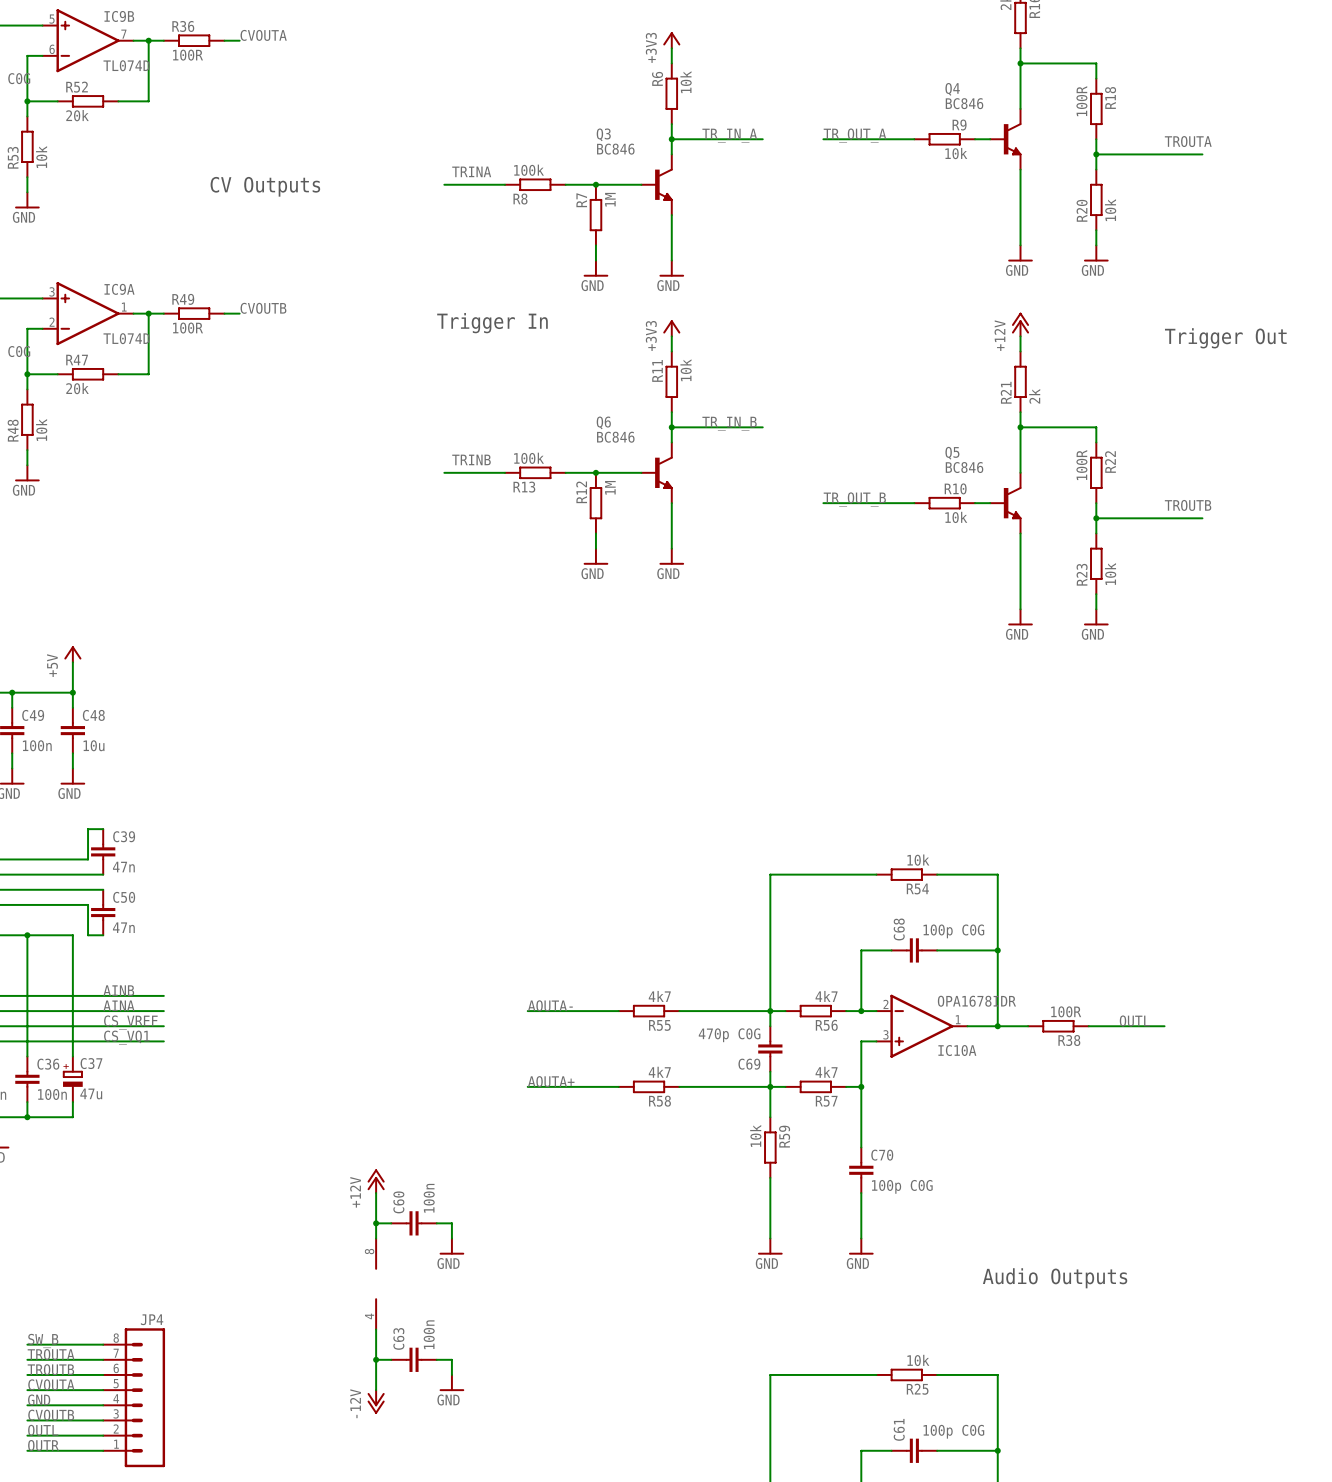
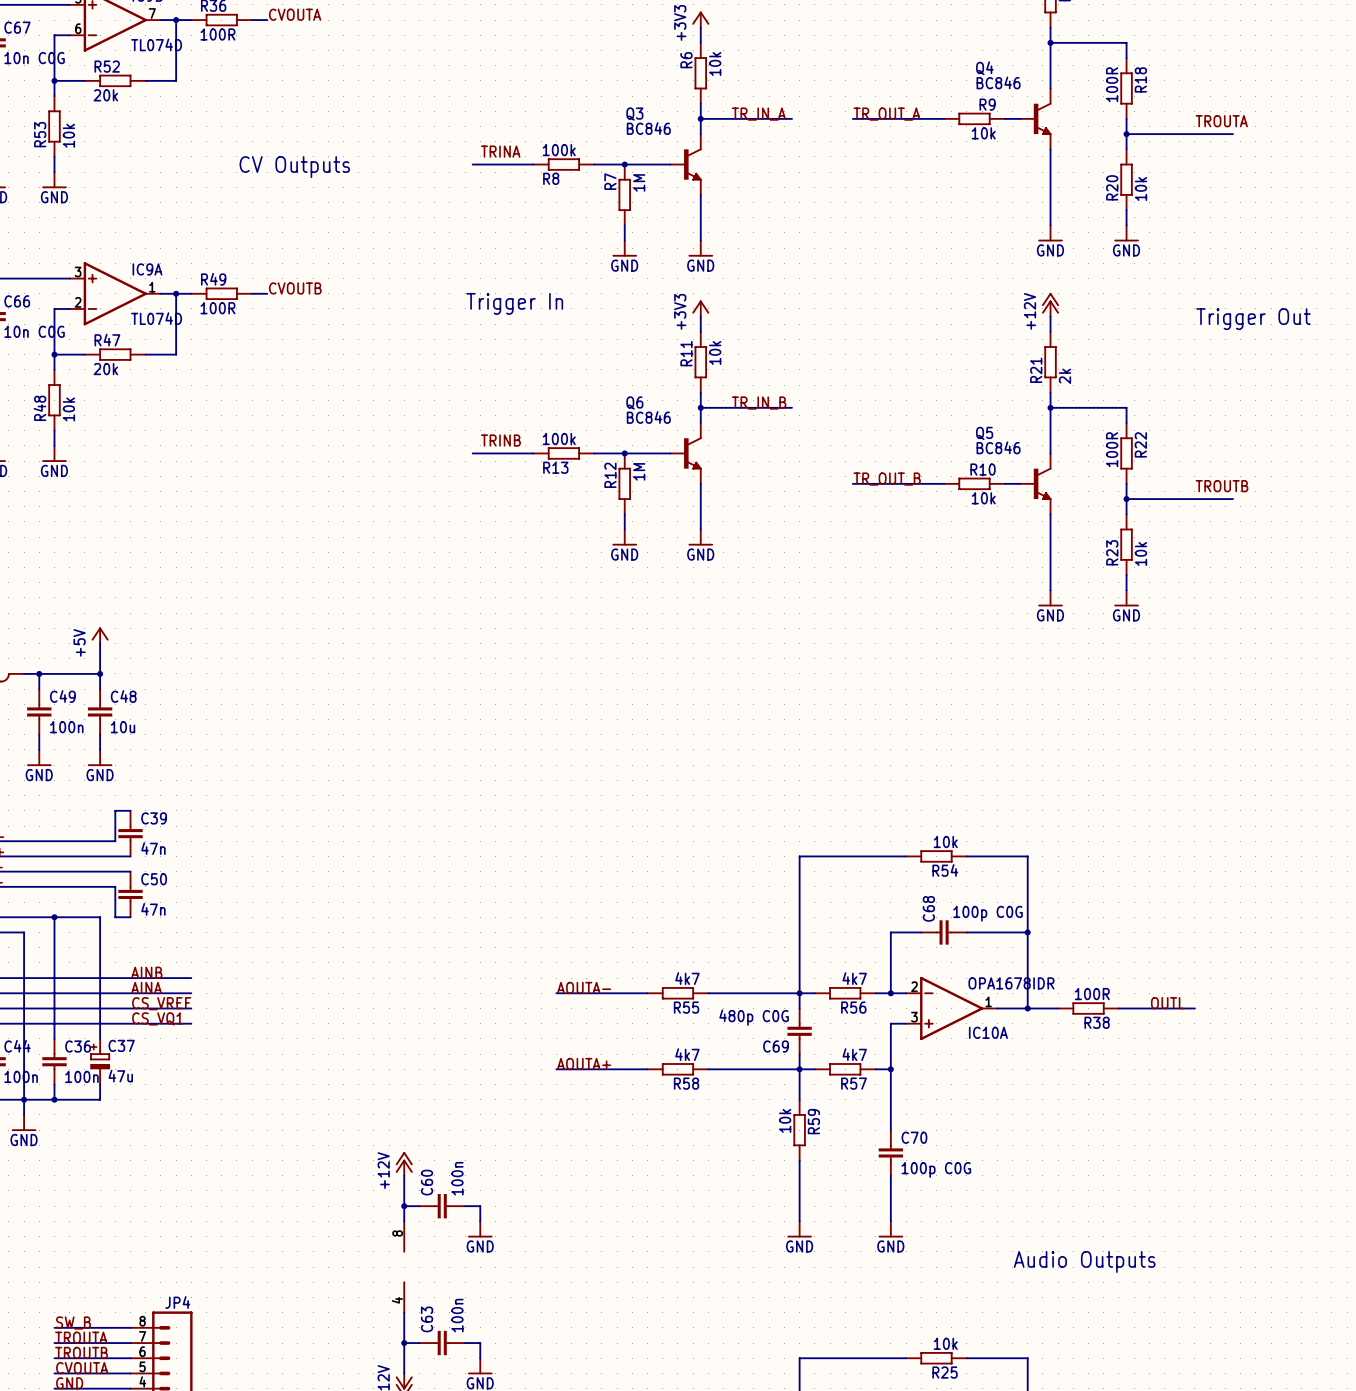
C69 value: 470p C0G (729, 1035) -> 480p C0G (754, 1017)

